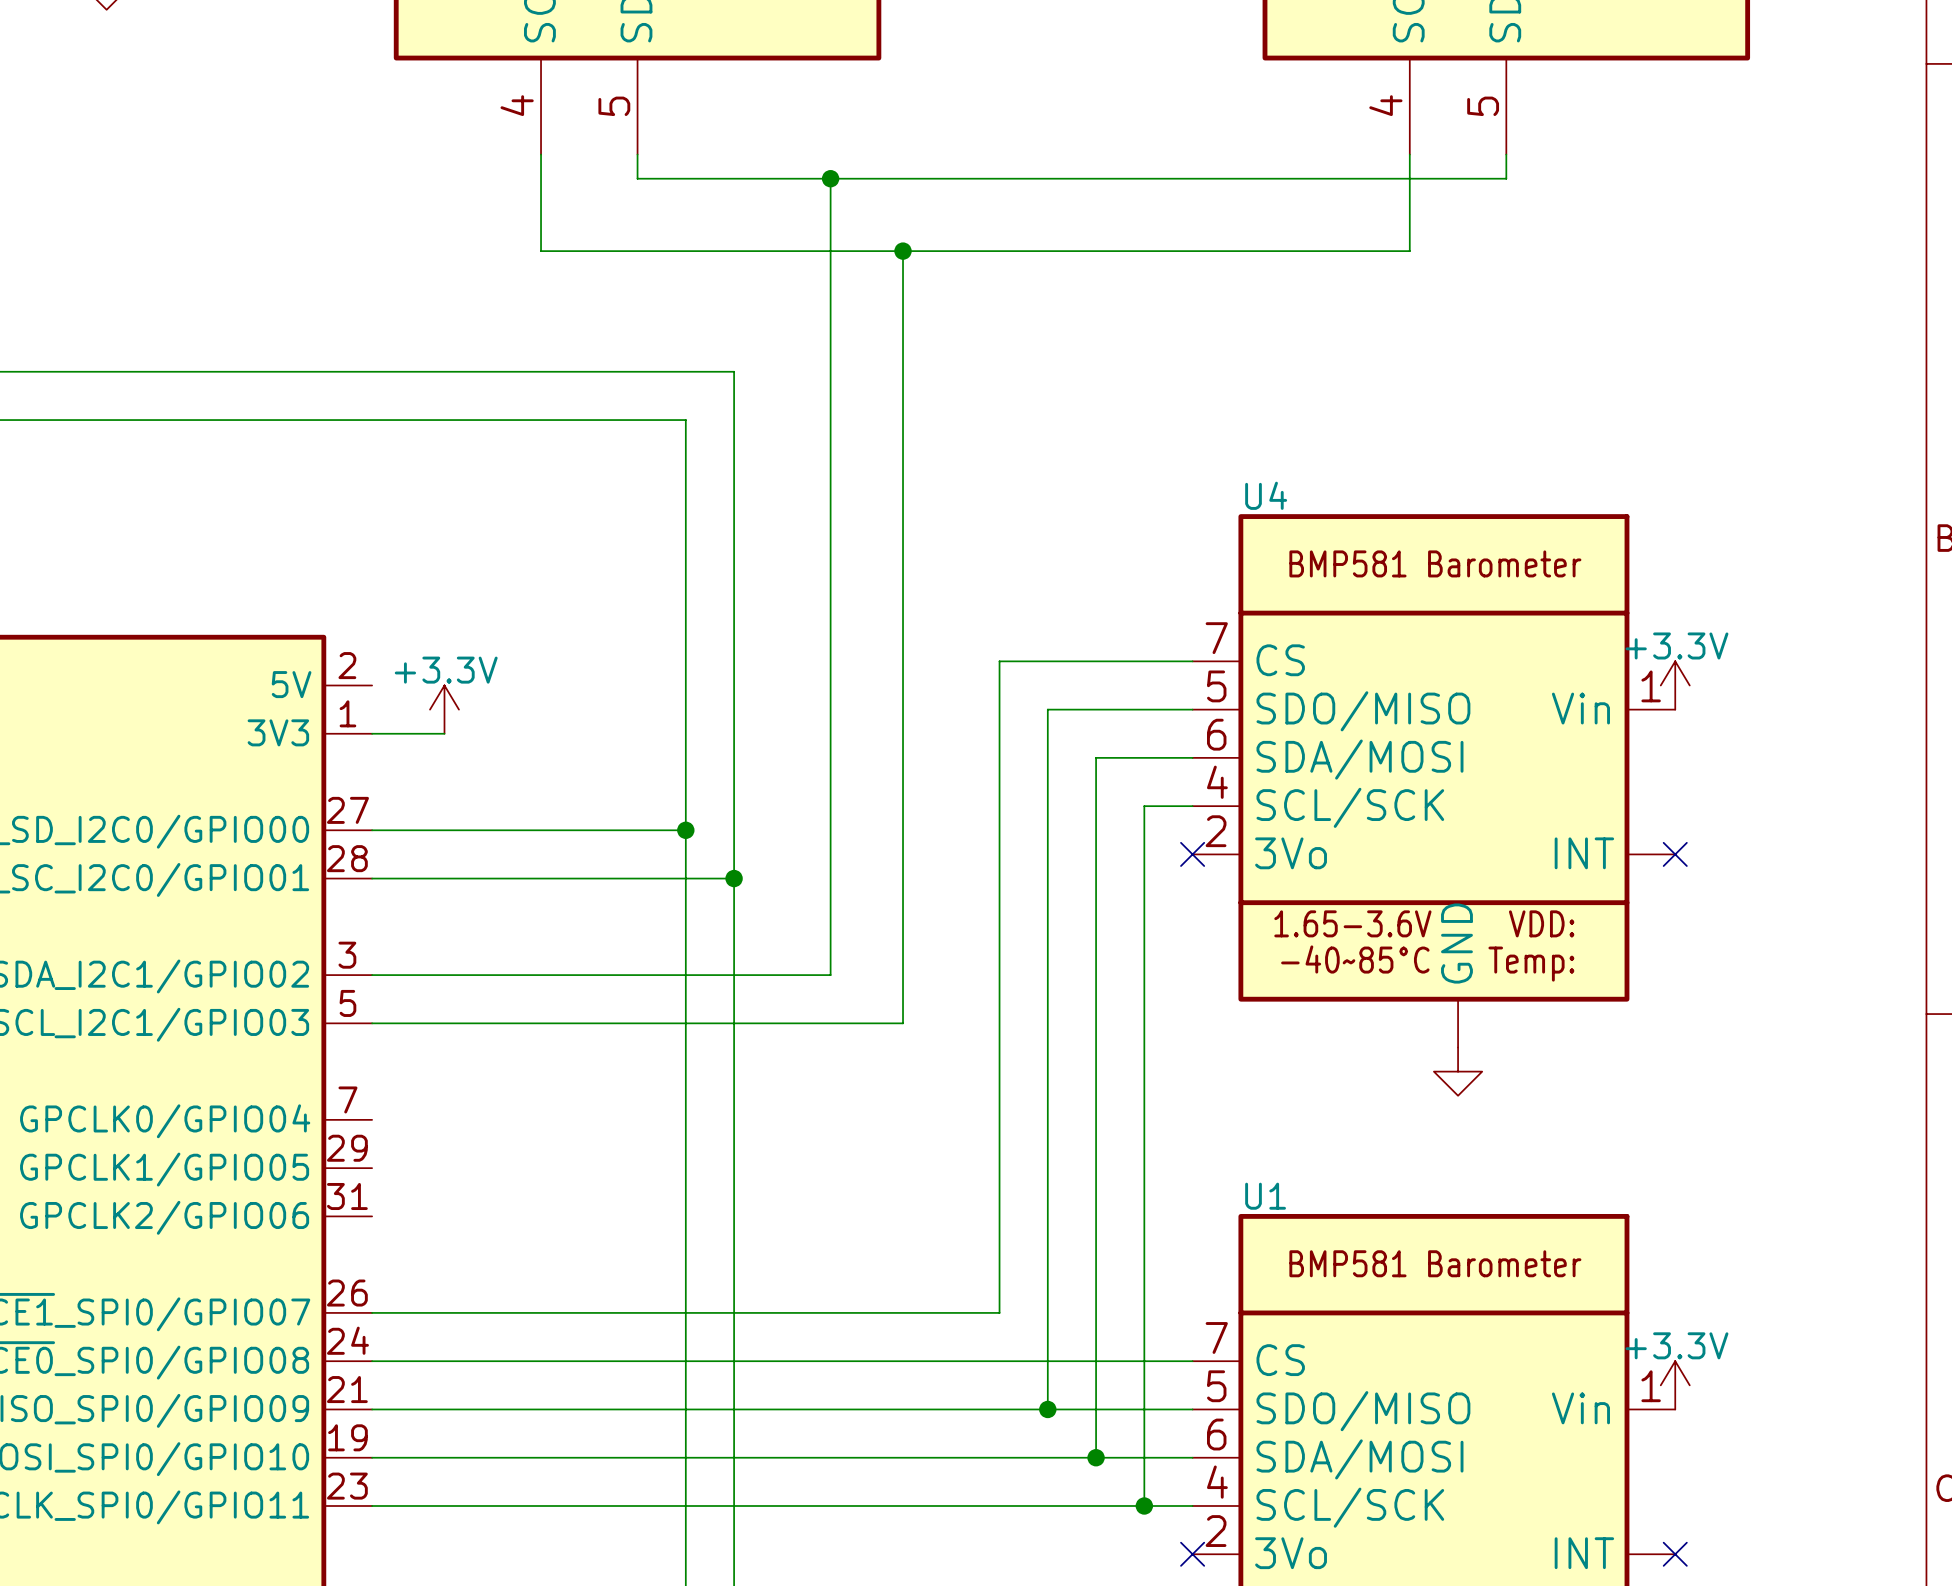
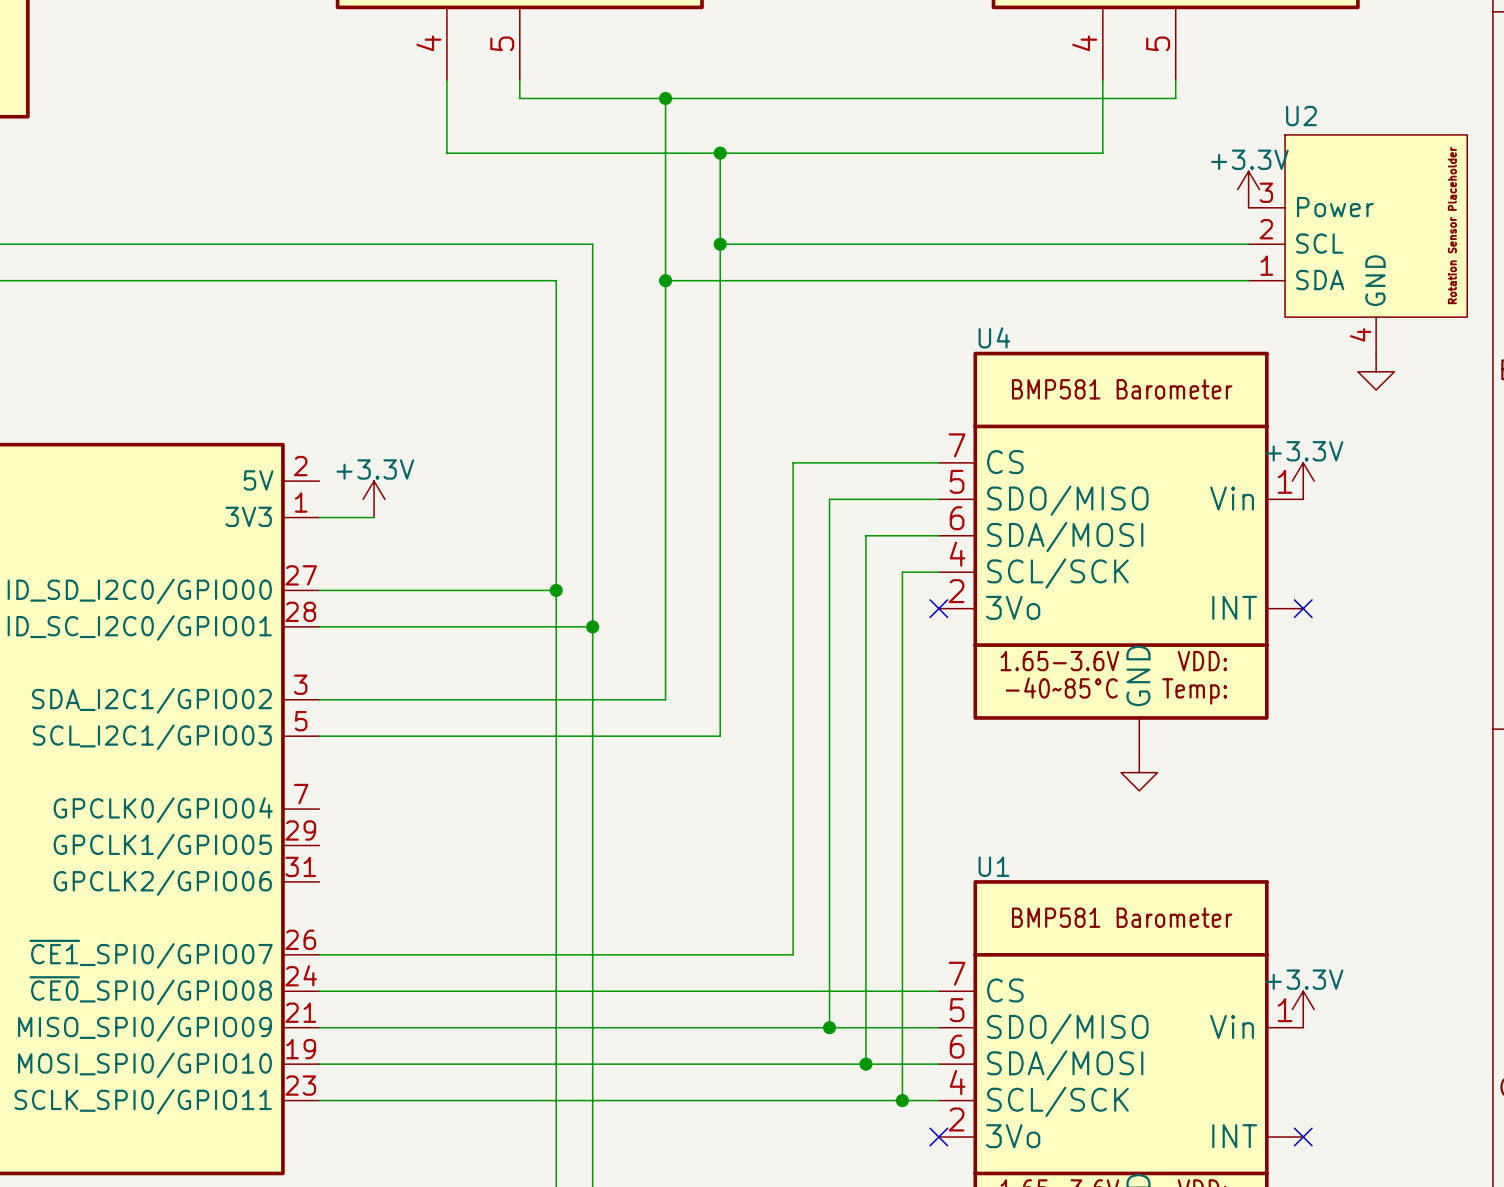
power symbol: none -> +3.3V (1248, 189)
wire: none -> (720, 244) (1248, 244)
junction: none -> (720, 244)
U2: none -> (1357, 244)
wire: none -> (665, 280) (1248, 280)
junction: none -> (665, 280)
power symbol: none -> (1376, 371)

